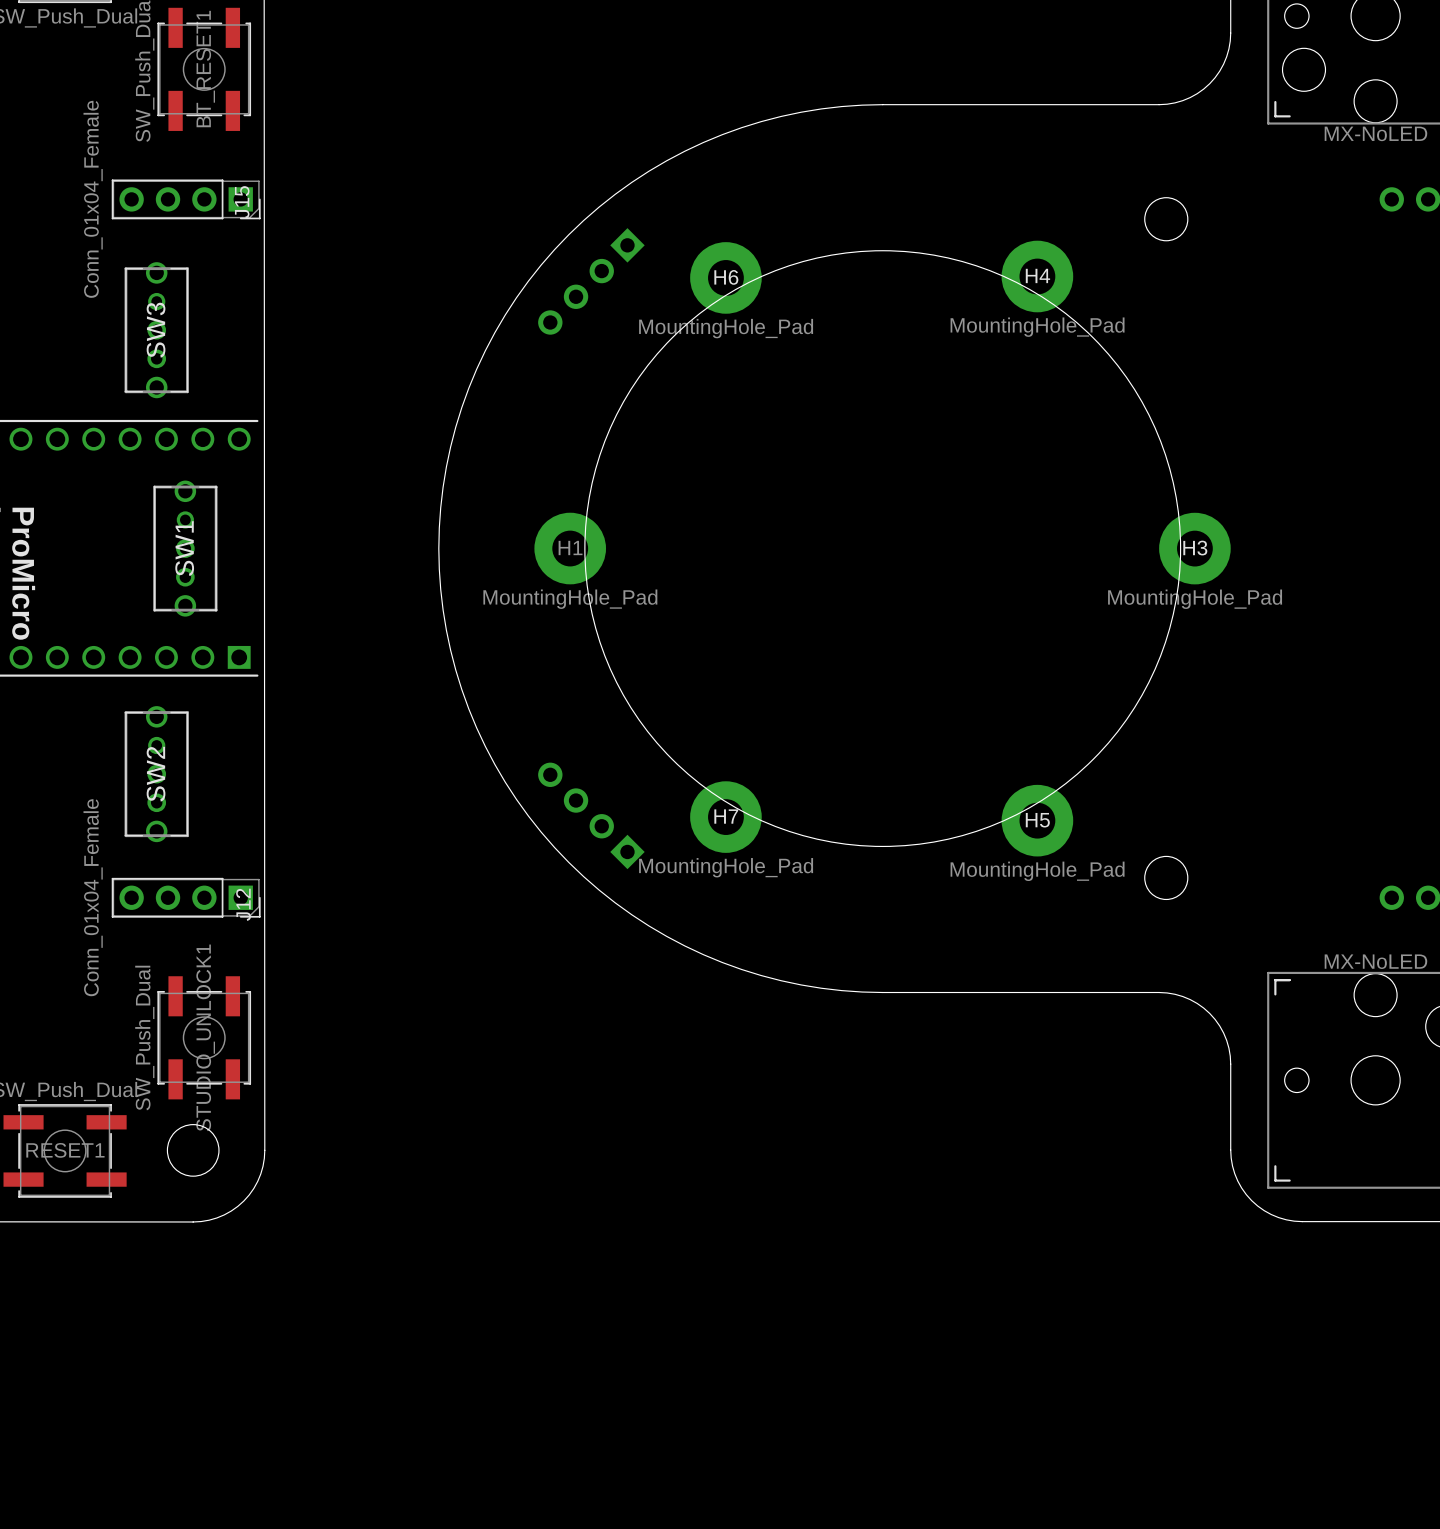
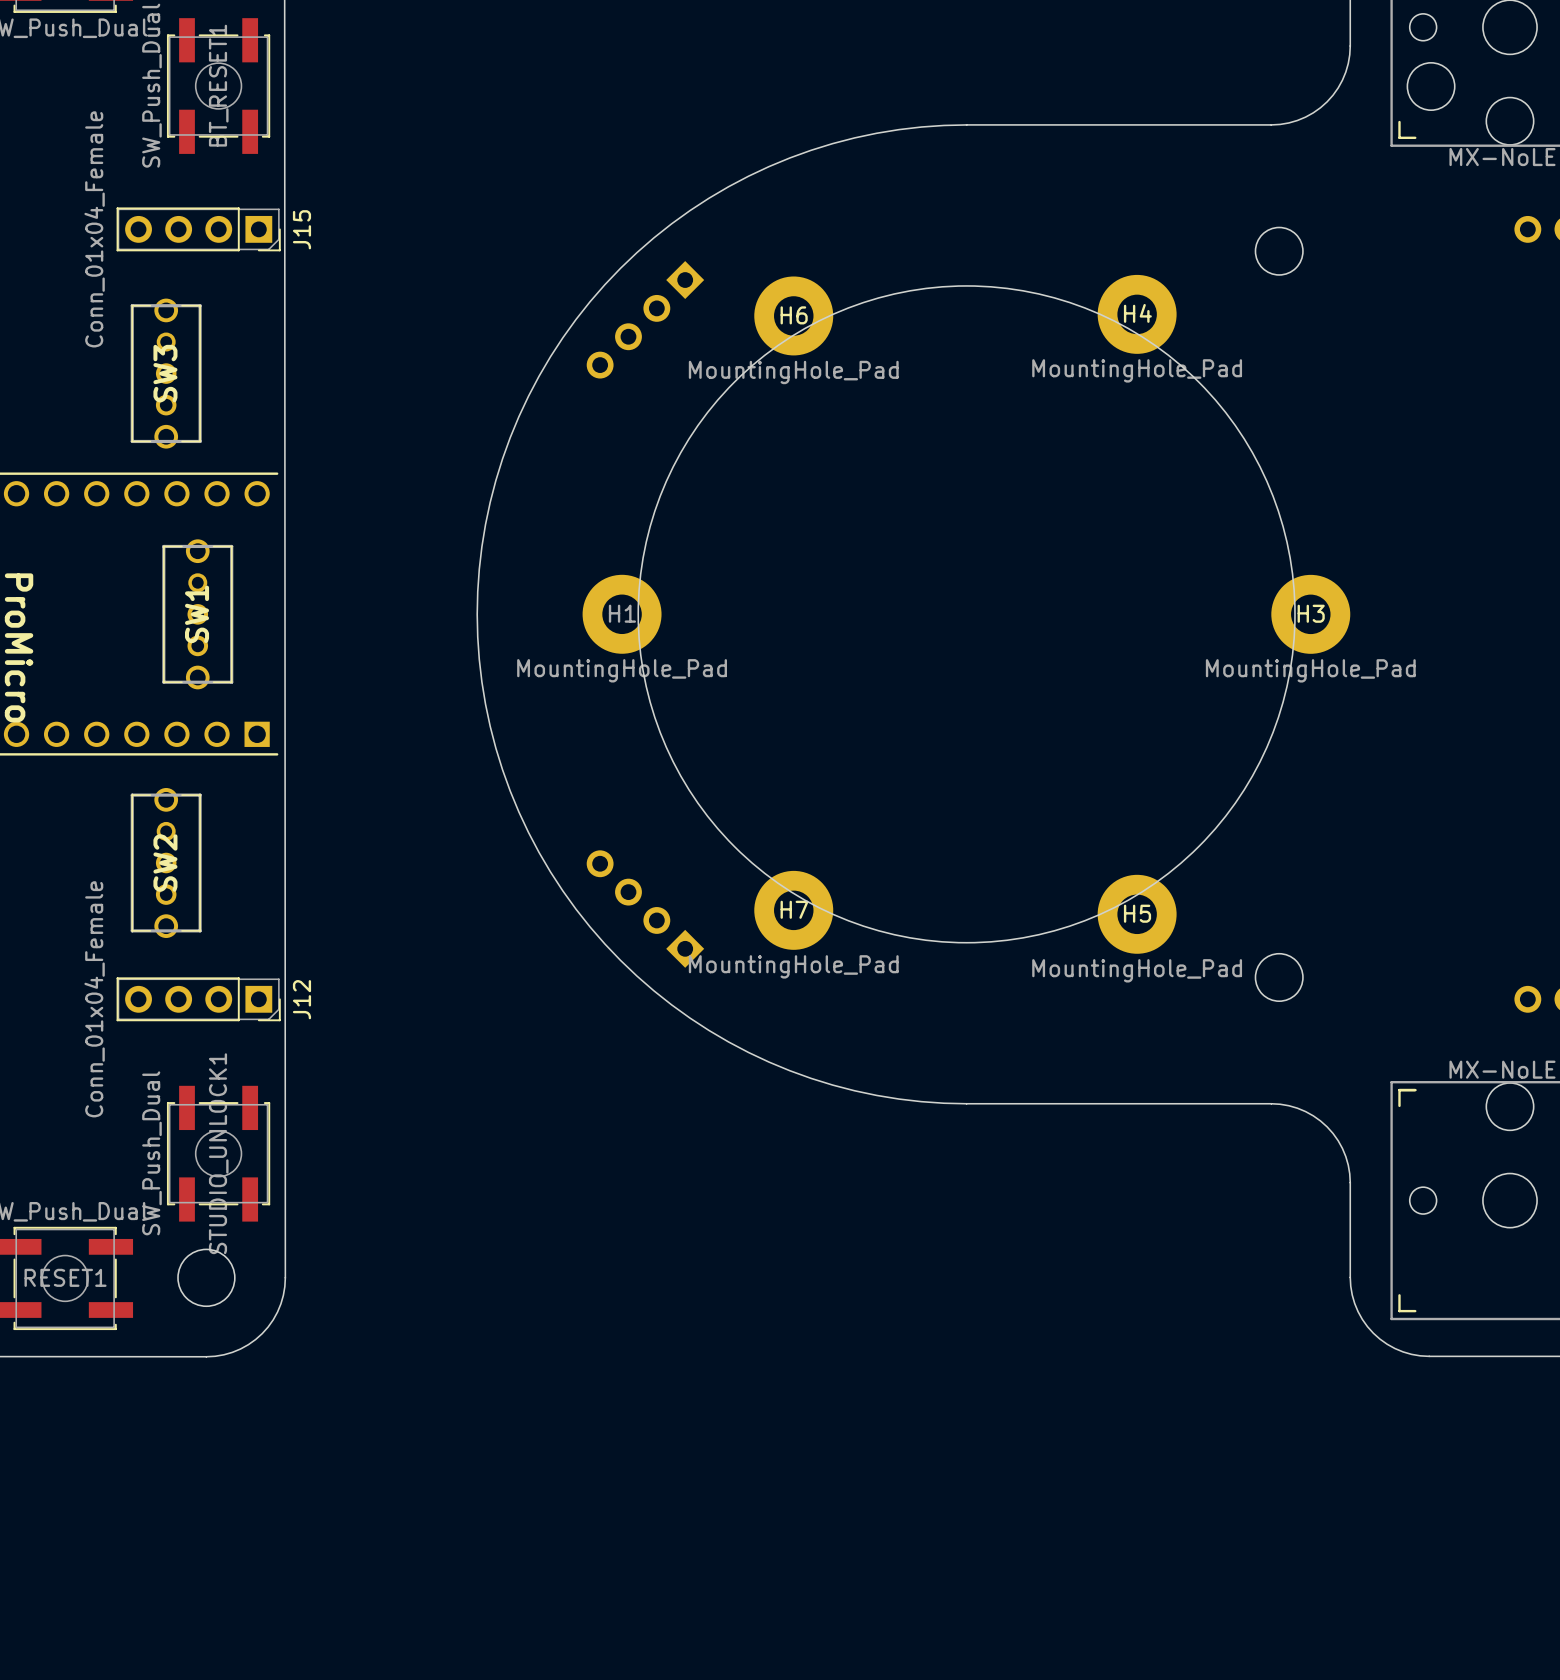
J15 name position: J15 (242, 202) -> J15 (301, 229)
J12 name position: J12 (243, 904) -> J12 (301, 999)

